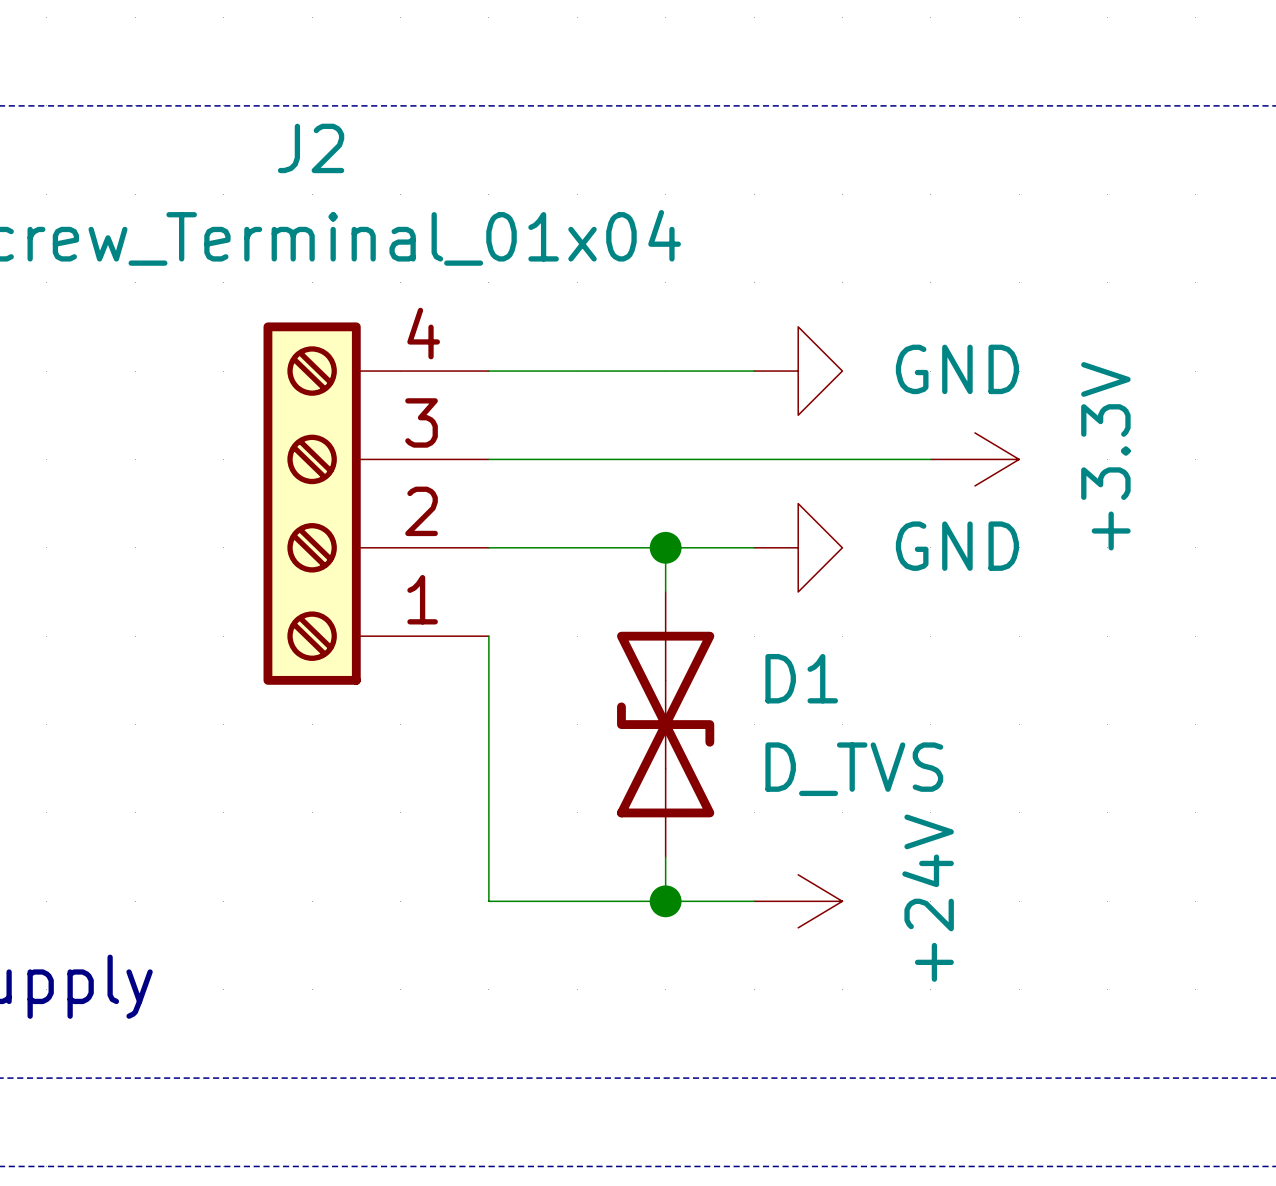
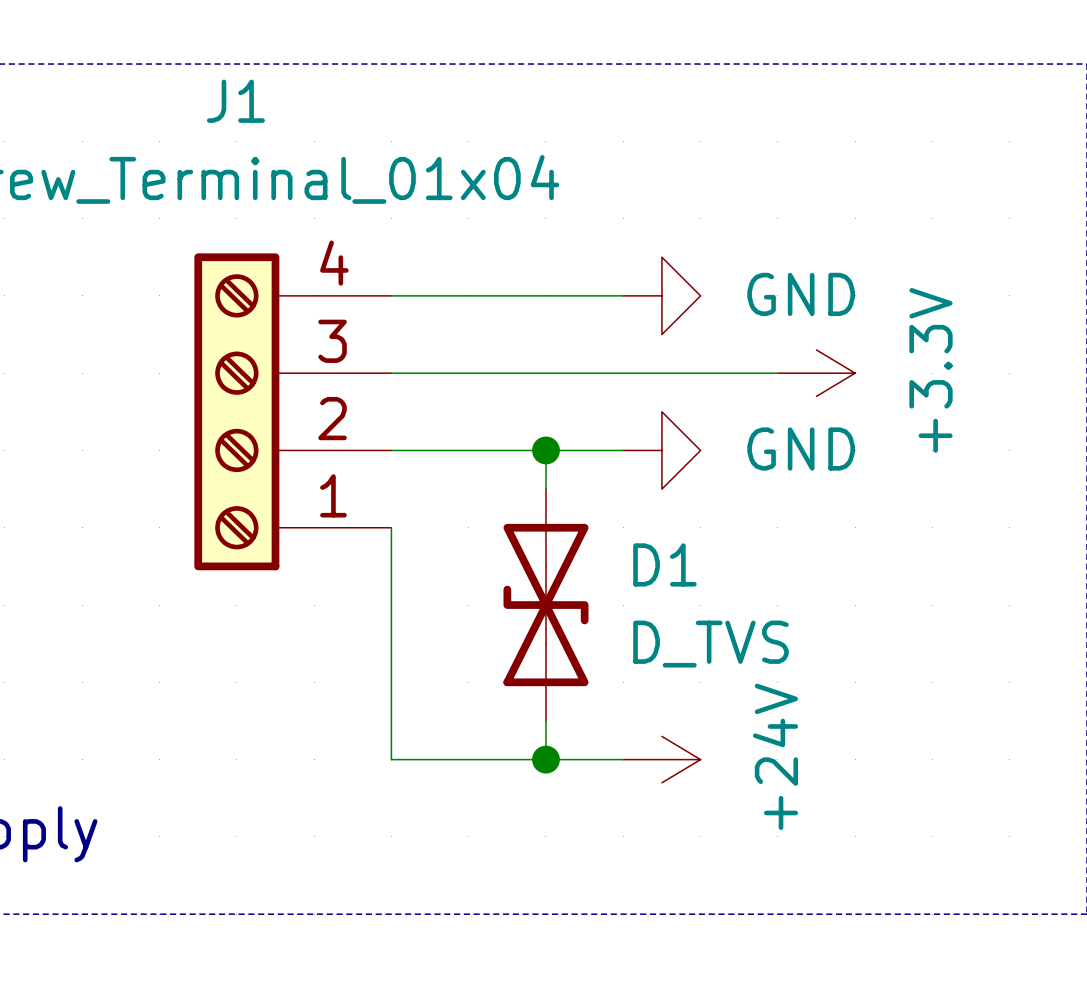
J2 name: J2 (311, 148) -> J1 (235, 101)

